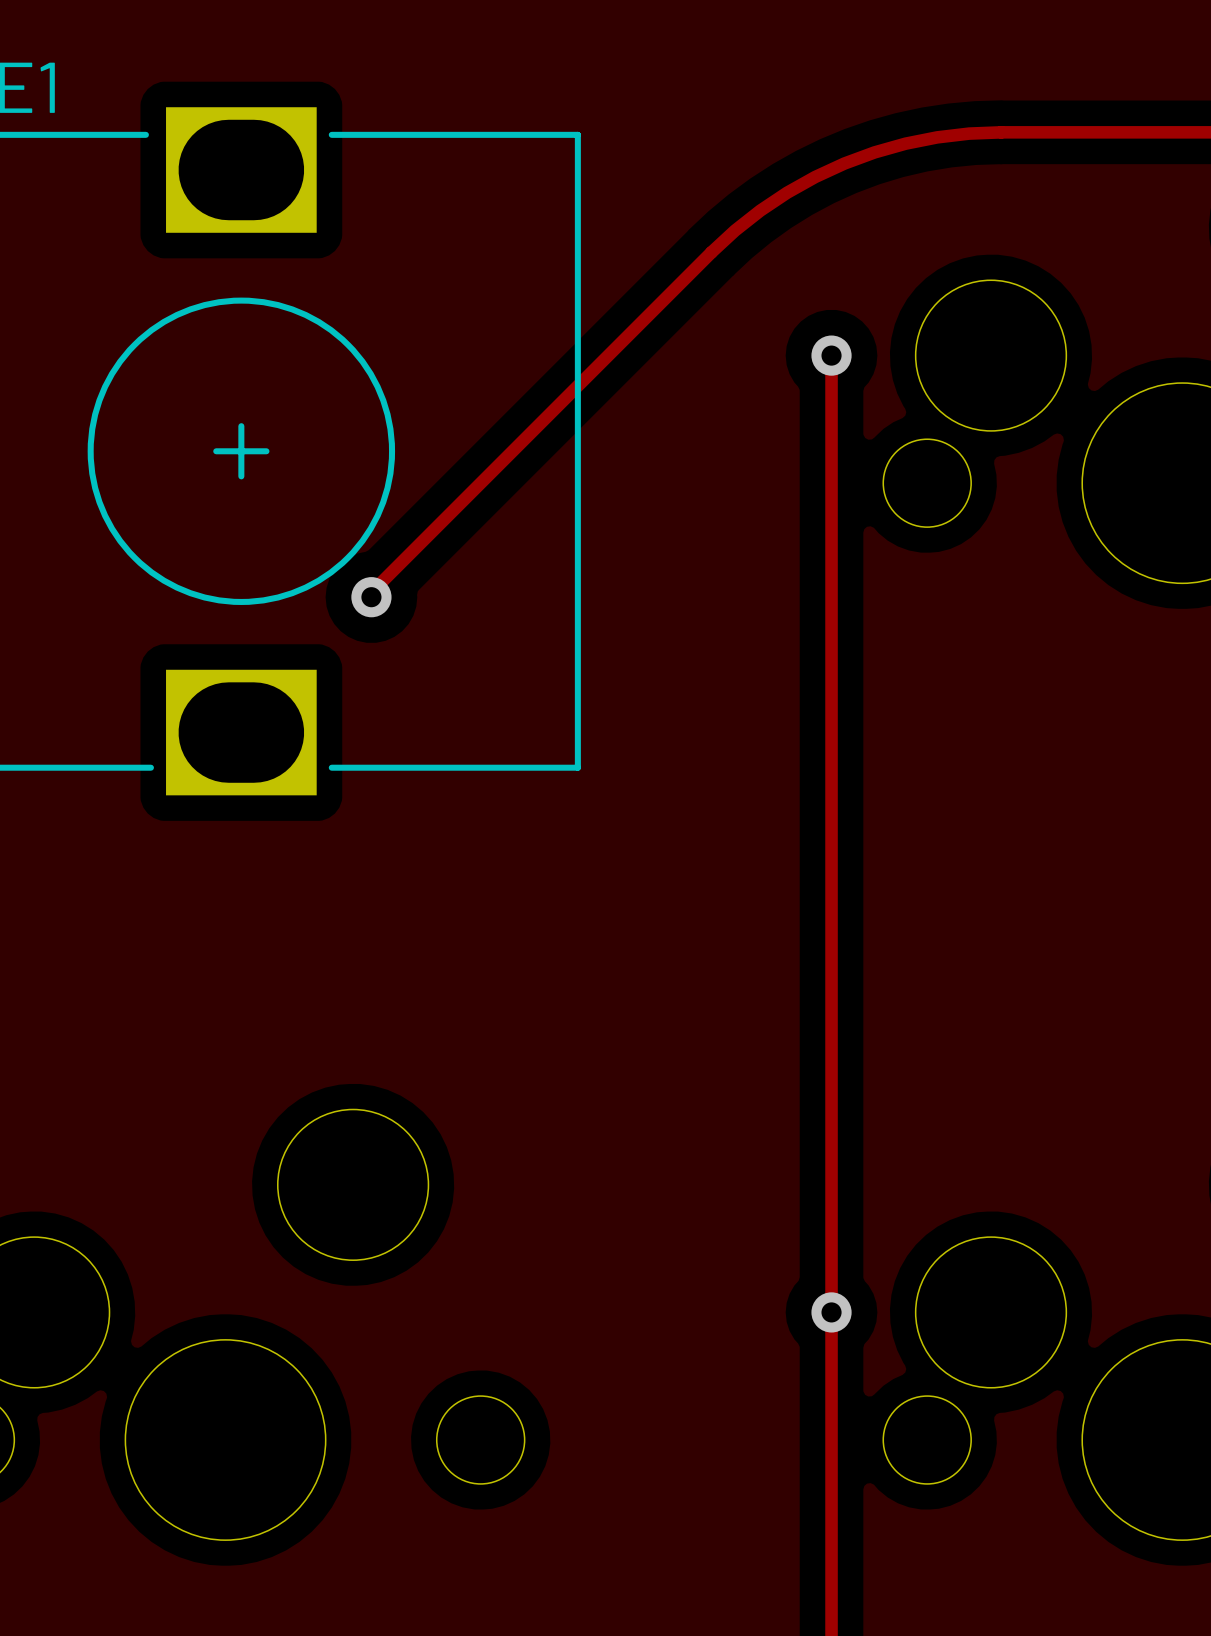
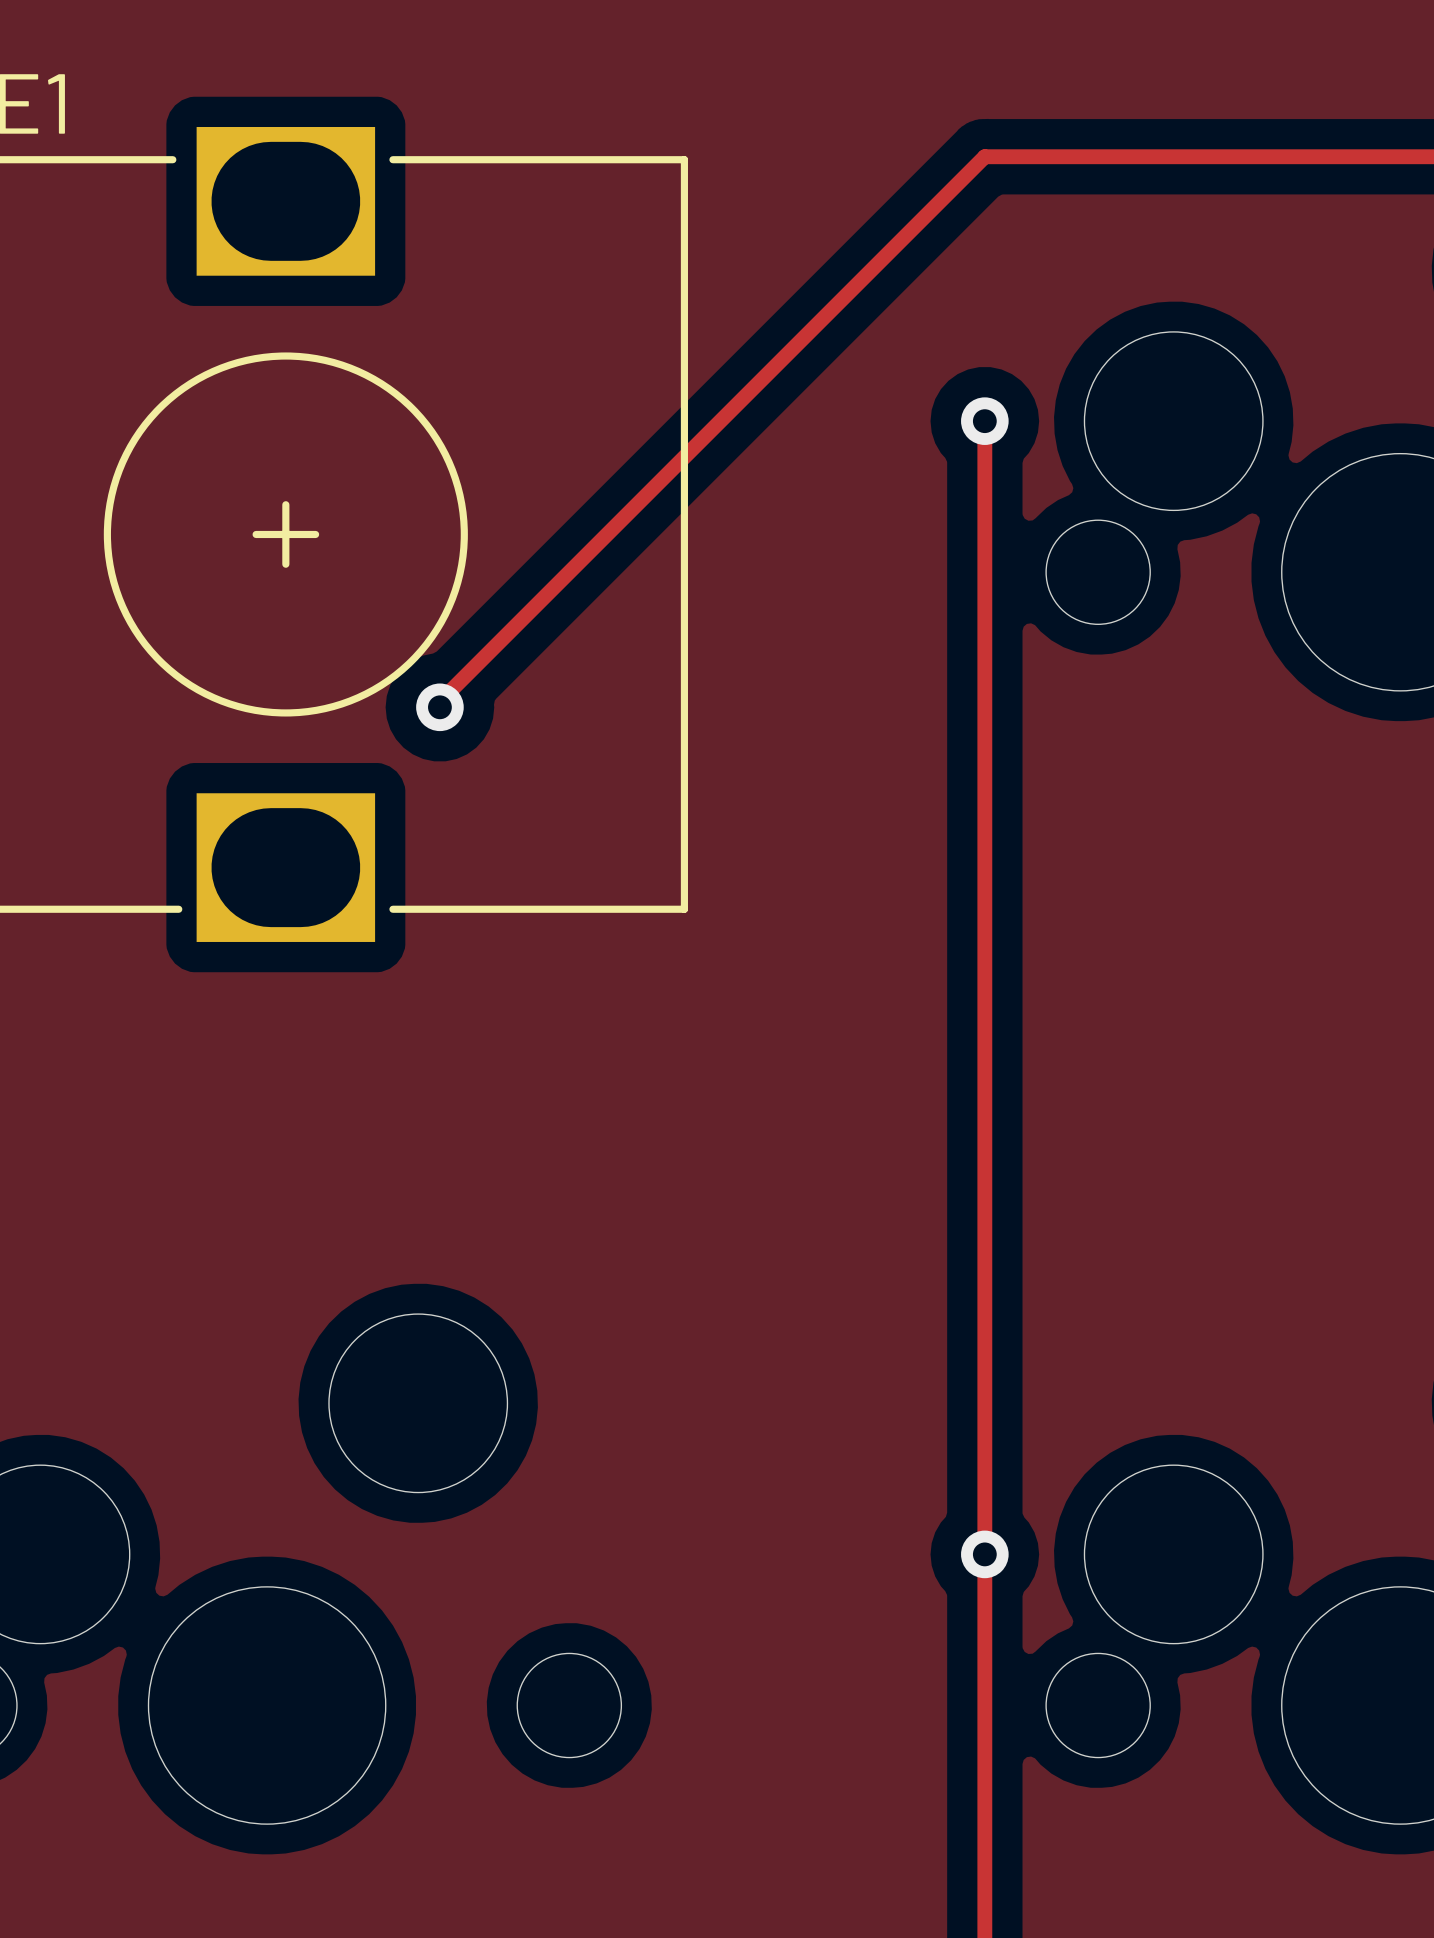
track: (1001, 132) (937, 137) (905, 143) (844, 163) (787, 192) (760, 210) (711, 252) -> (1185, 156) (984, 156) (842, 298)

